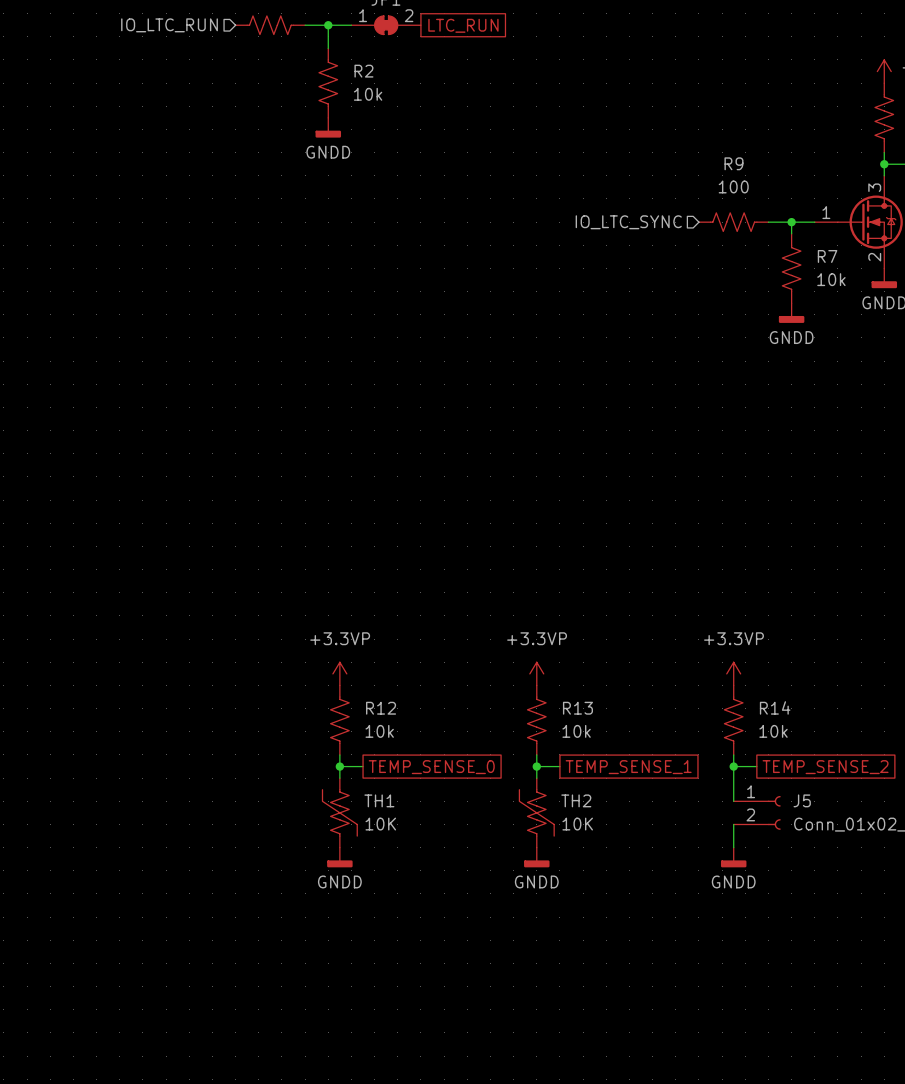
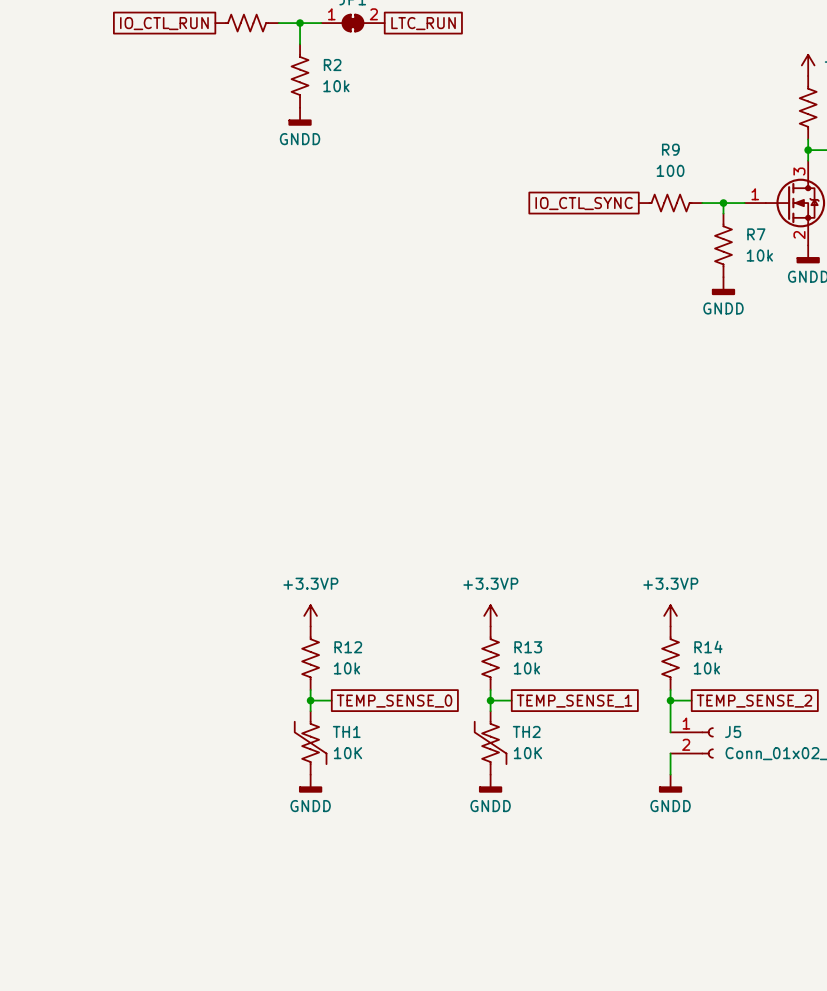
hierarchical label: IO_LTC_RUN (169, 25) -> none
global label: none -> IO_CTL_RUN (164, 23)
hierarchical label: IO_LTC_SYNC (628, 222) -> none
global label: none -> IO_CTL_SYNC (584, 203)

